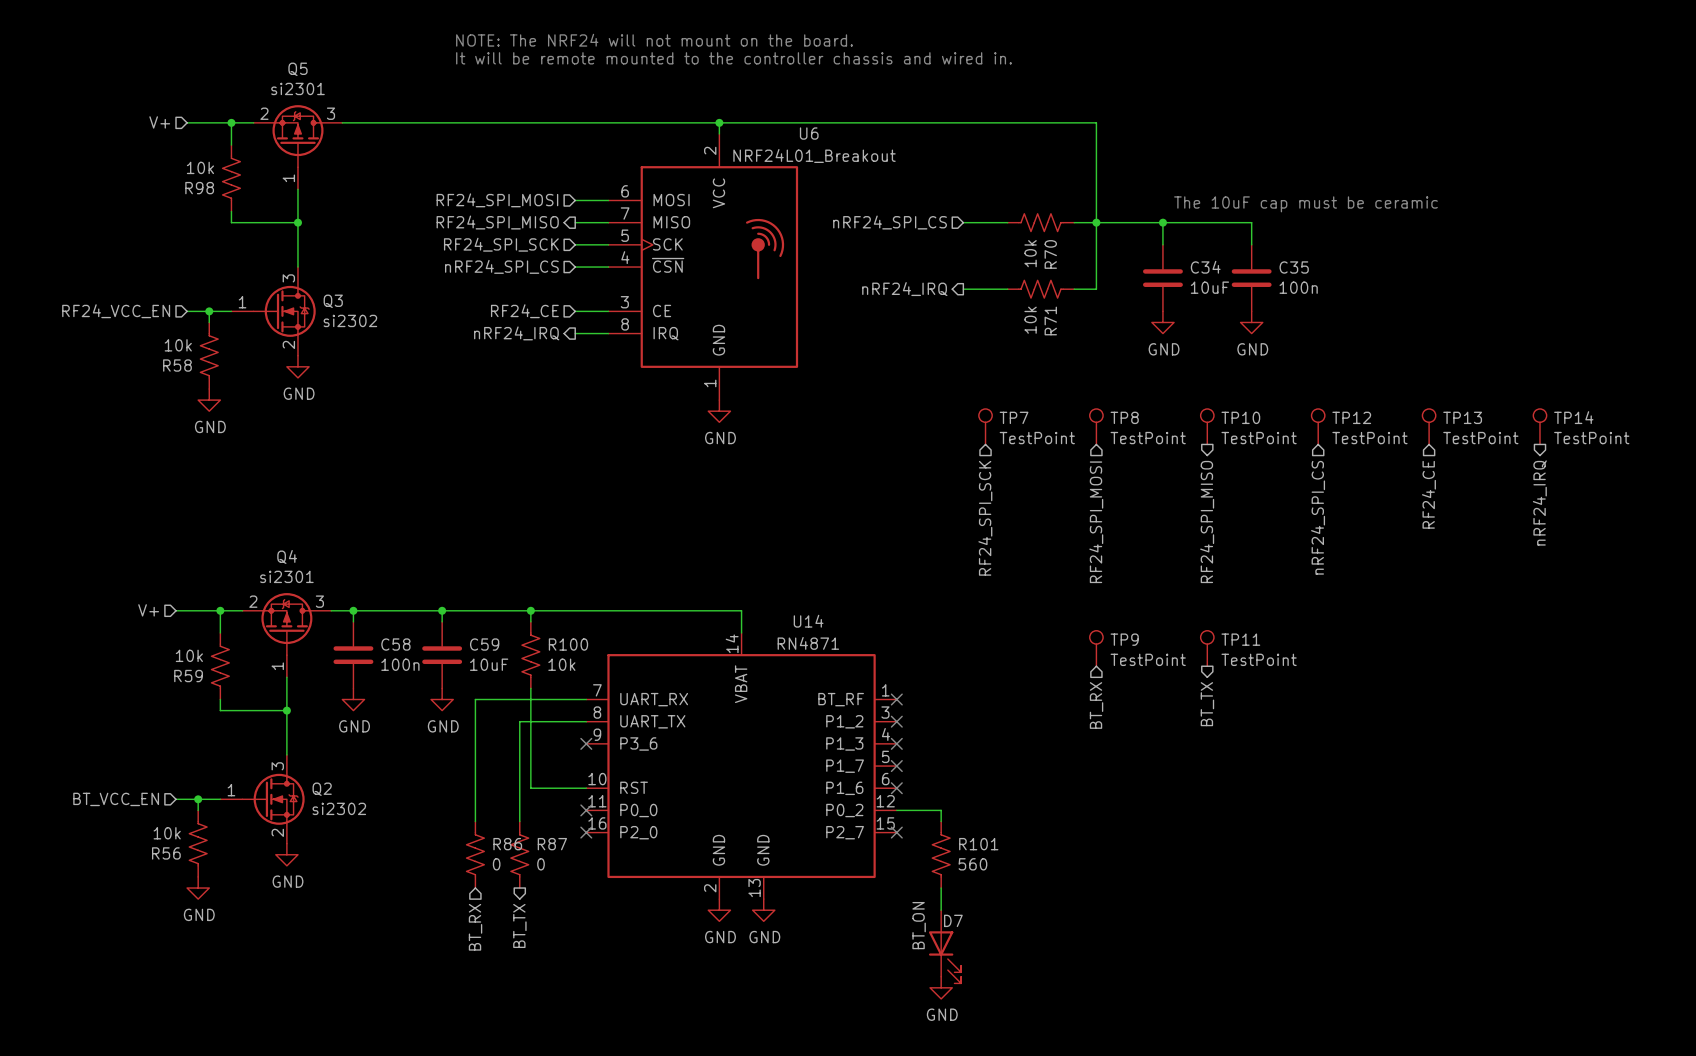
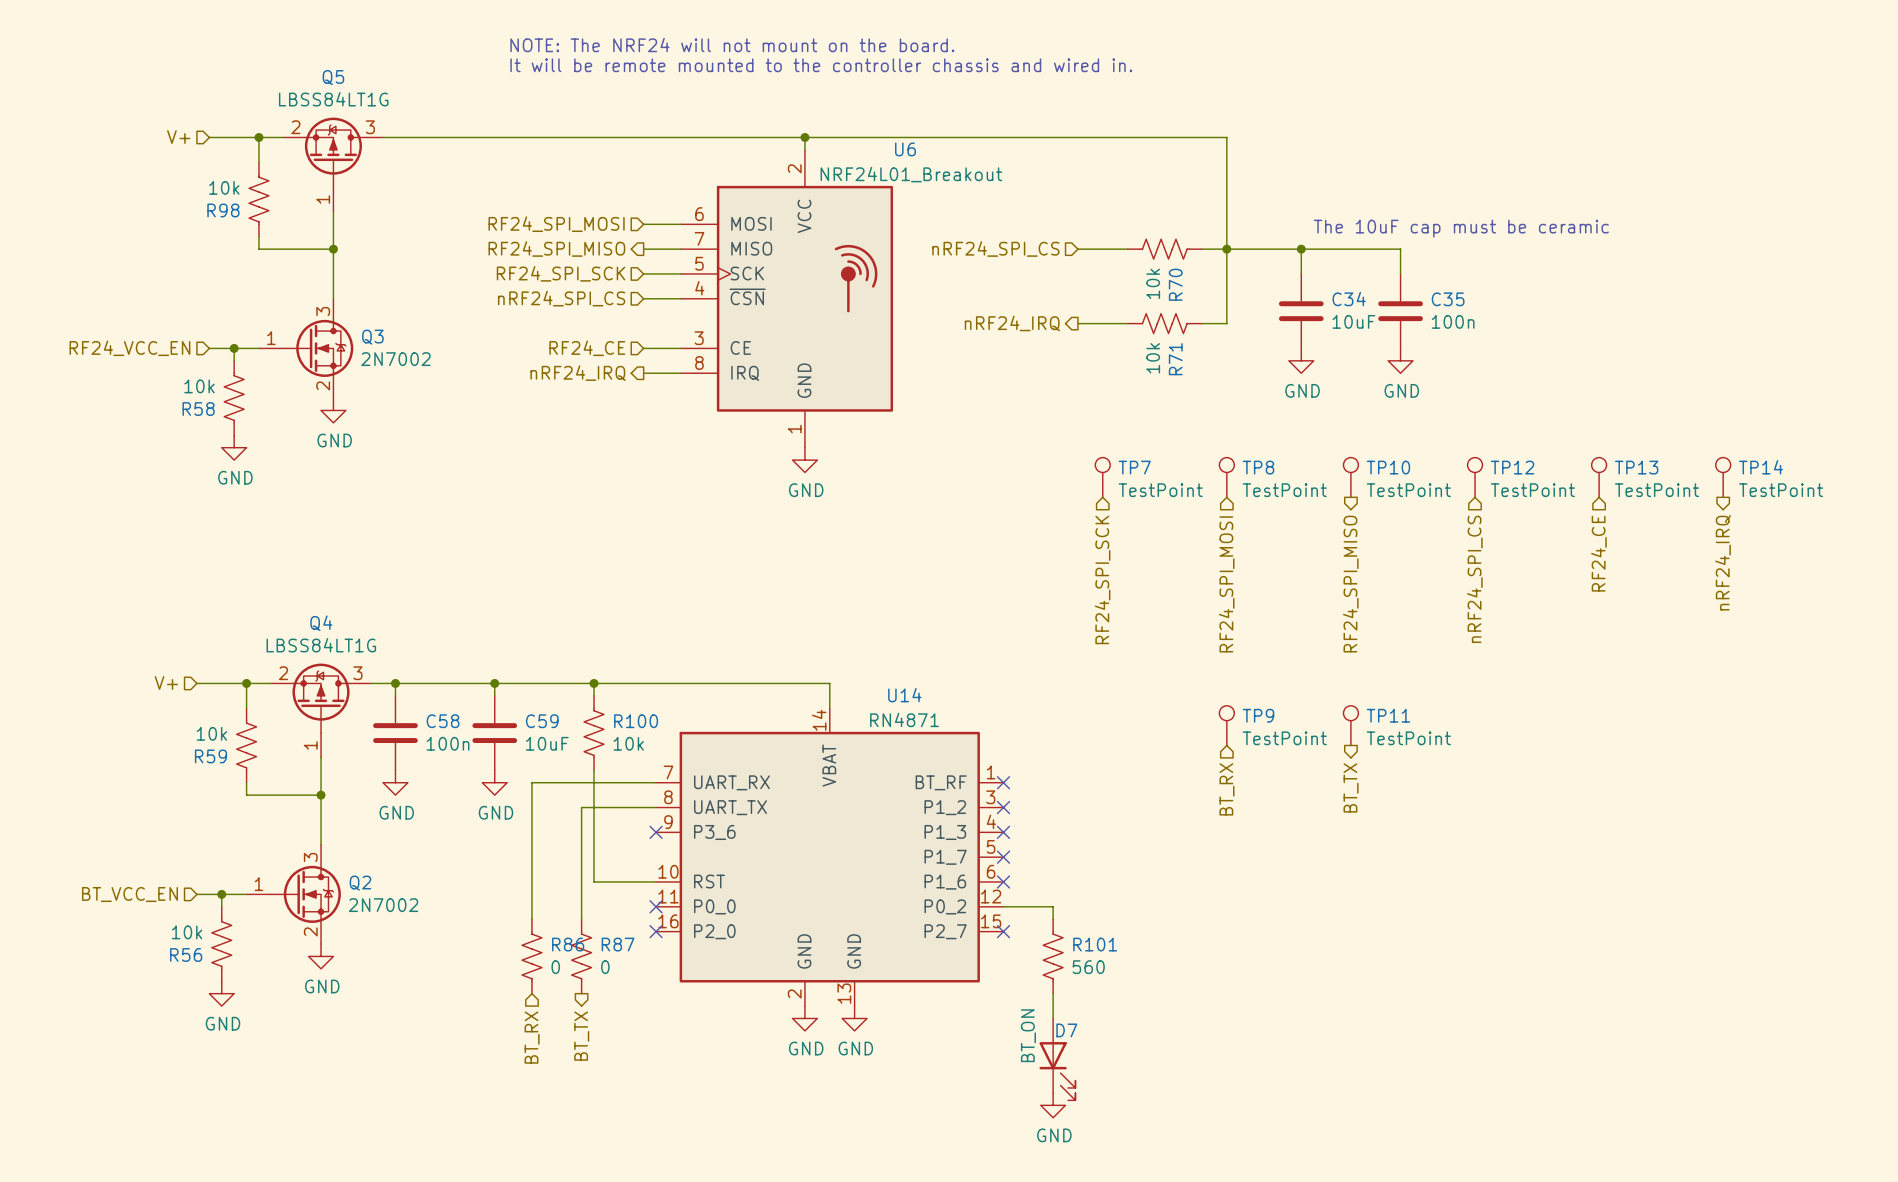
Q5 value: si2301 (297, 88) -> LBSS84LT1G (333, 99)
Q3 value: si2302 (350, 320) -> 2N7002 (395, 359)
Q4 value: si2301 (286, 576) -> LBSS84LT1G (321, 645)
Q2 value: si2302 (339, 808) -> 2N7002 (383, 905)

